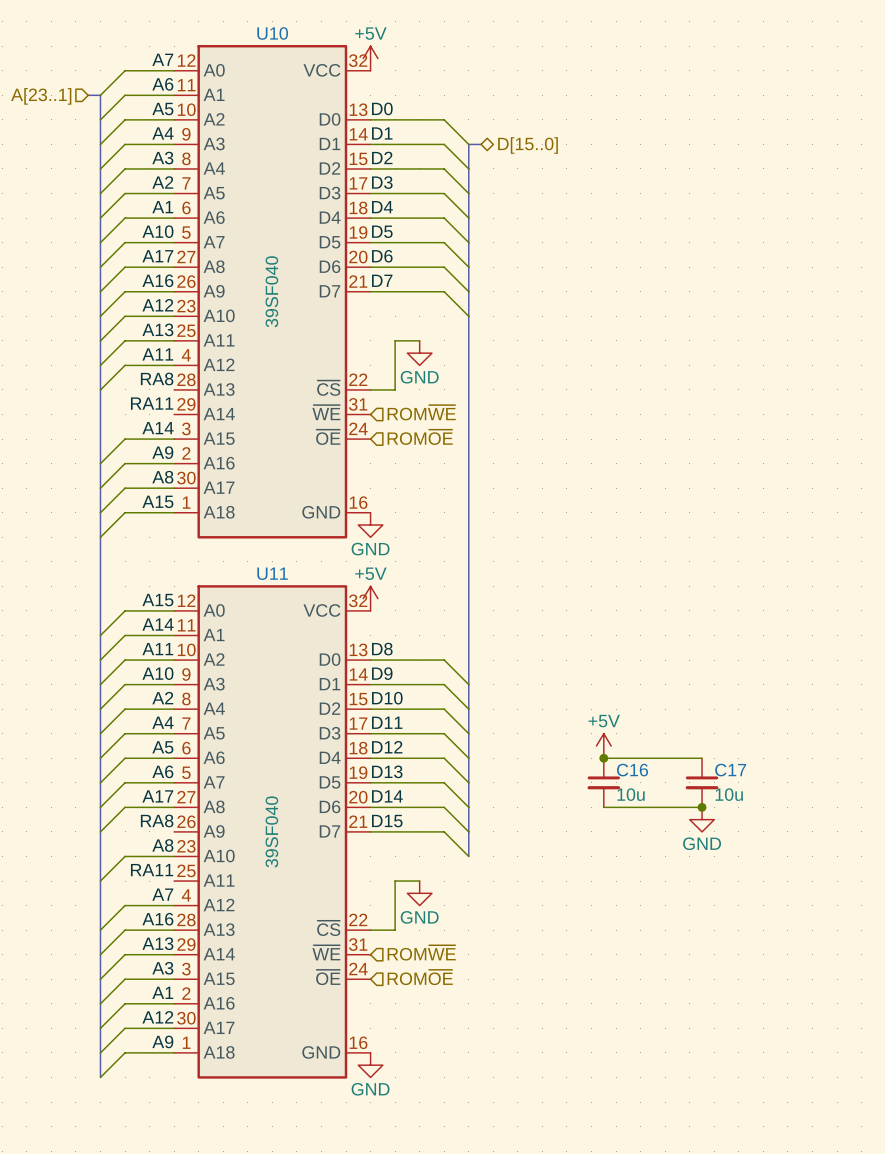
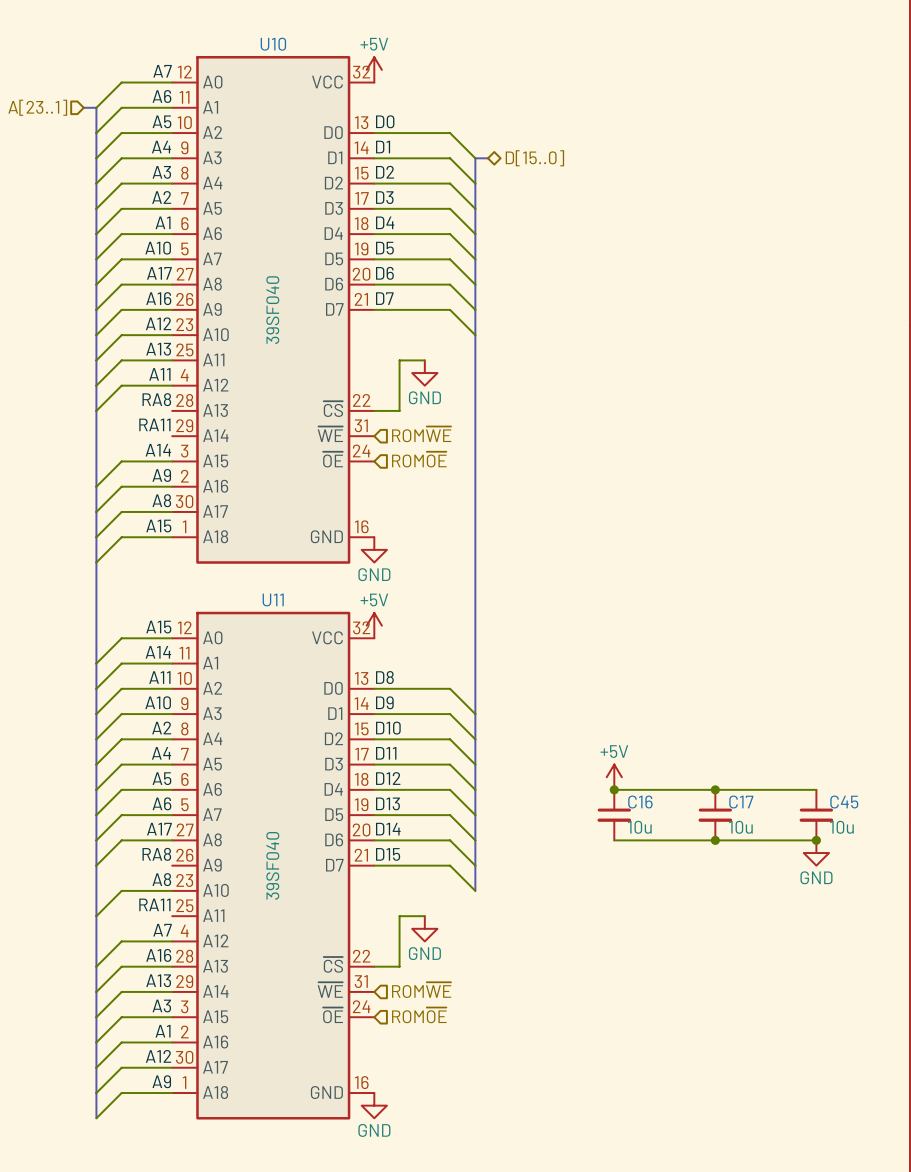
wire: none -> (715, 789) (816, 789)
junction: none -> (715, 789)
C45: none -> 10u (816, 815)
wire: none -> (715, 840) (816, 840)
junction: none -> (816, 840)
power symbol position: GND (702, 819) -> GND (816, 853)

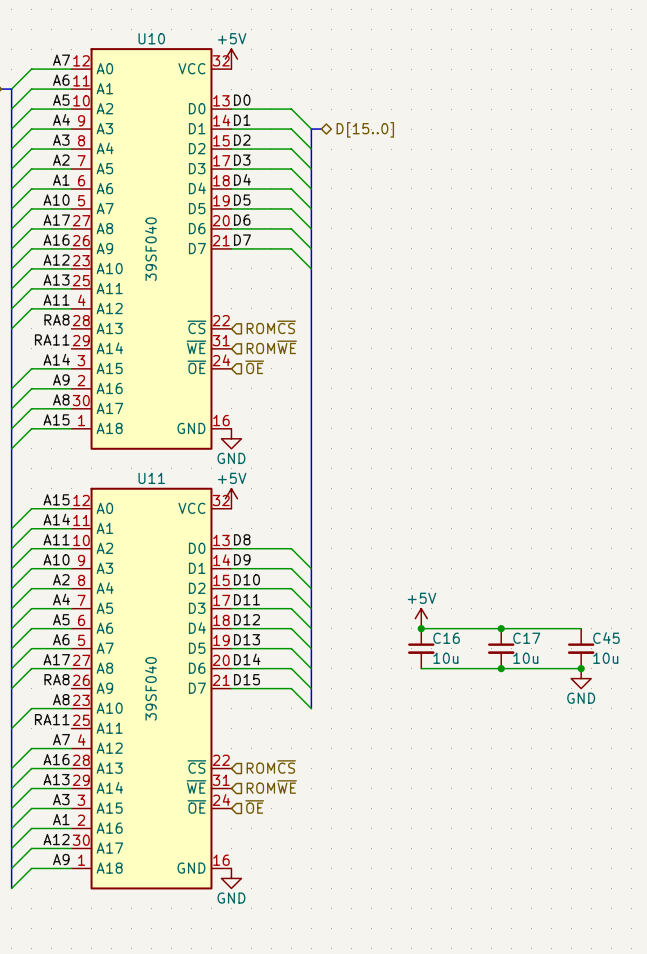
wire: (424, 360) (399, 360) (399, 410) (374, 410) -> none
power symbol: GND (424, 373) -> none
hierarchical label: none -> ROM~{CS} (271, 327)
hierarchical label: ROM~{OE} (419, 459) -> ~{OE} (254, 367)
wire: (424, 916) (399, 916) (399, 966) (374, 966) -> none
power symbol: GND (424, 928) -> none
hierarchical label: none -> ROM~{CS} (271, 767)
hierarchical label: ROM~{OE} (419, 1015) -> ~{OE} (254, 806)

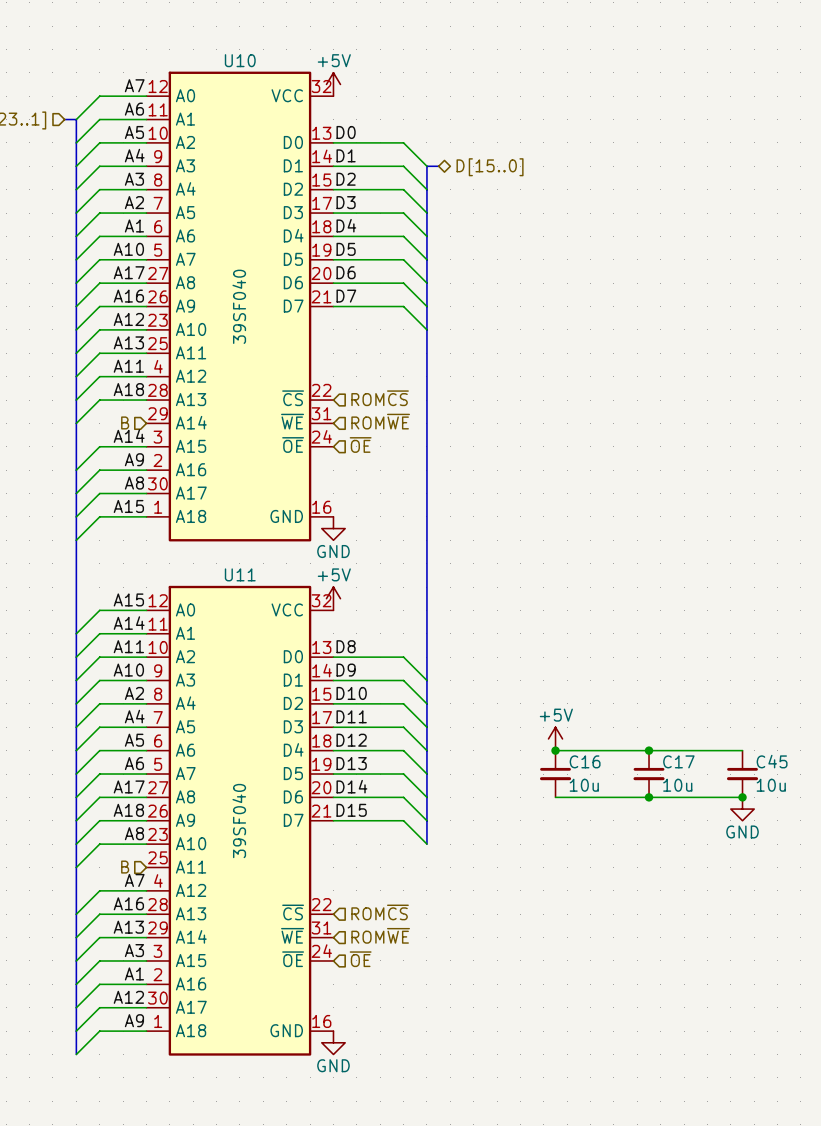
label: RA8 (56, 319) -> A18 (128, 389)
wire: none -> (146, 400) (99, 400) (76, 423)
label: RA11 (52, 339) -> none
hierarchical label: none -> B (125, 422)
label: RA8 (56, 679) -> A18 (128, 810)
wire: none -> (146, 820) (99, 820) (76, 844)
label: RA11 (52, 719) -> none
hierarchical label: none -> B (125, 867)

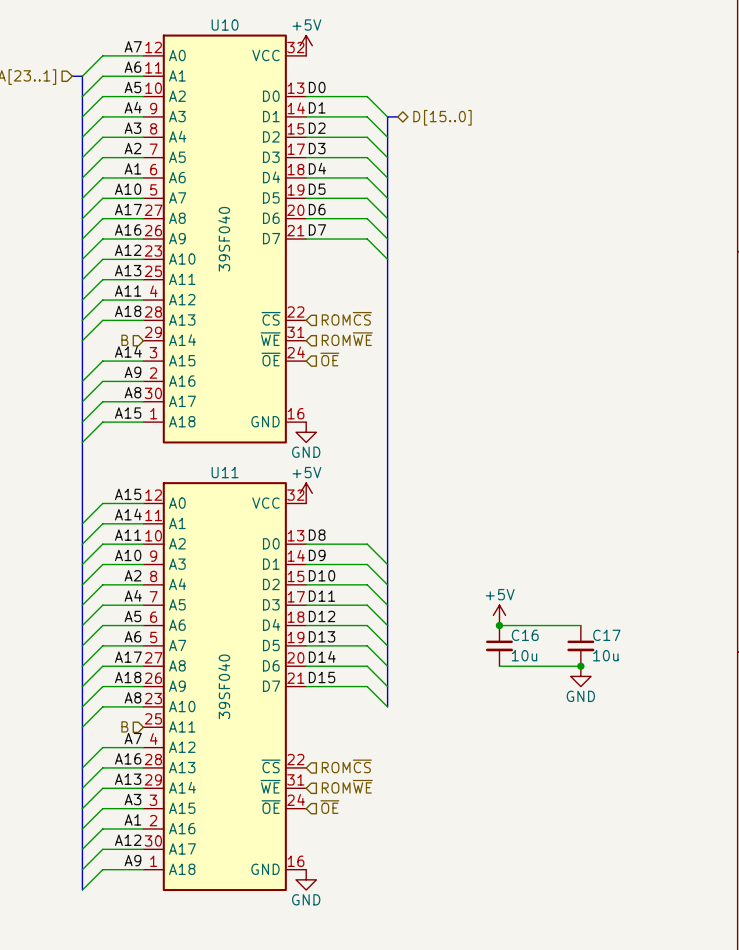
wire: (649, 750) (742, 750) -> none
junction: (649, 750) -> none
C45: 10u (742, 774) -> none
wire: (649, 797) (742, 797) -> none
junction: (742, 797) -> none
power symbol position: GND (742, 809) -> GND (580, 676)

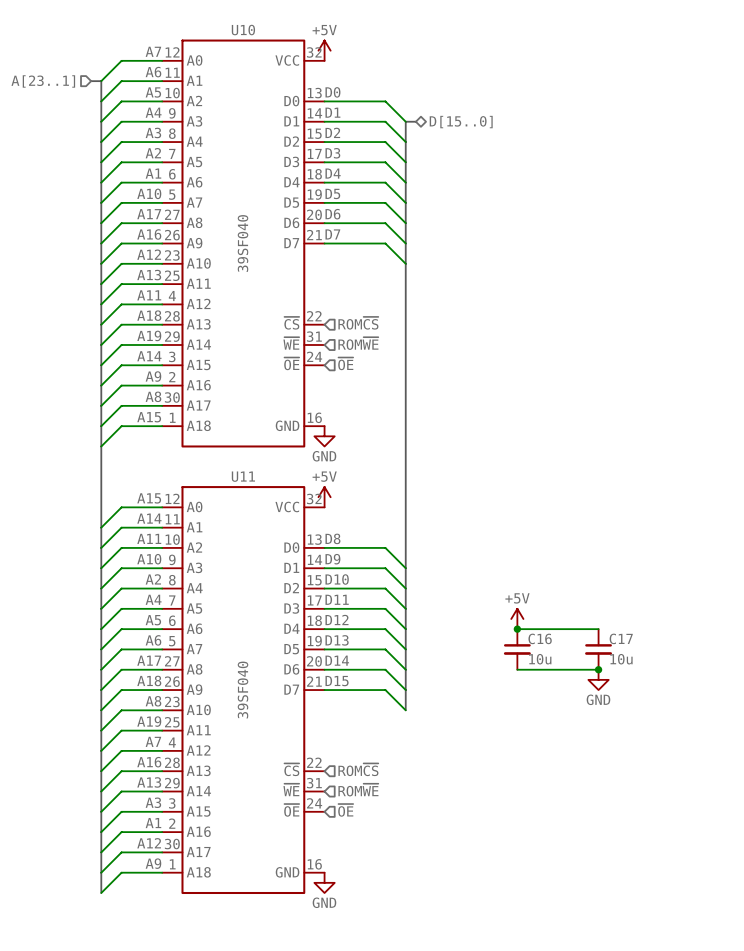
label: none -> A19 (149, 335)
hierarchical label: B (124, 340) -> none
wire: none -> (162, 344) (121, 344) (101, 365)
label: none -> A19 (149, 721)
hierarchical label: B (124, 726) -> none
wire: none -> (162, 730) (121, 730) (101, 750)

